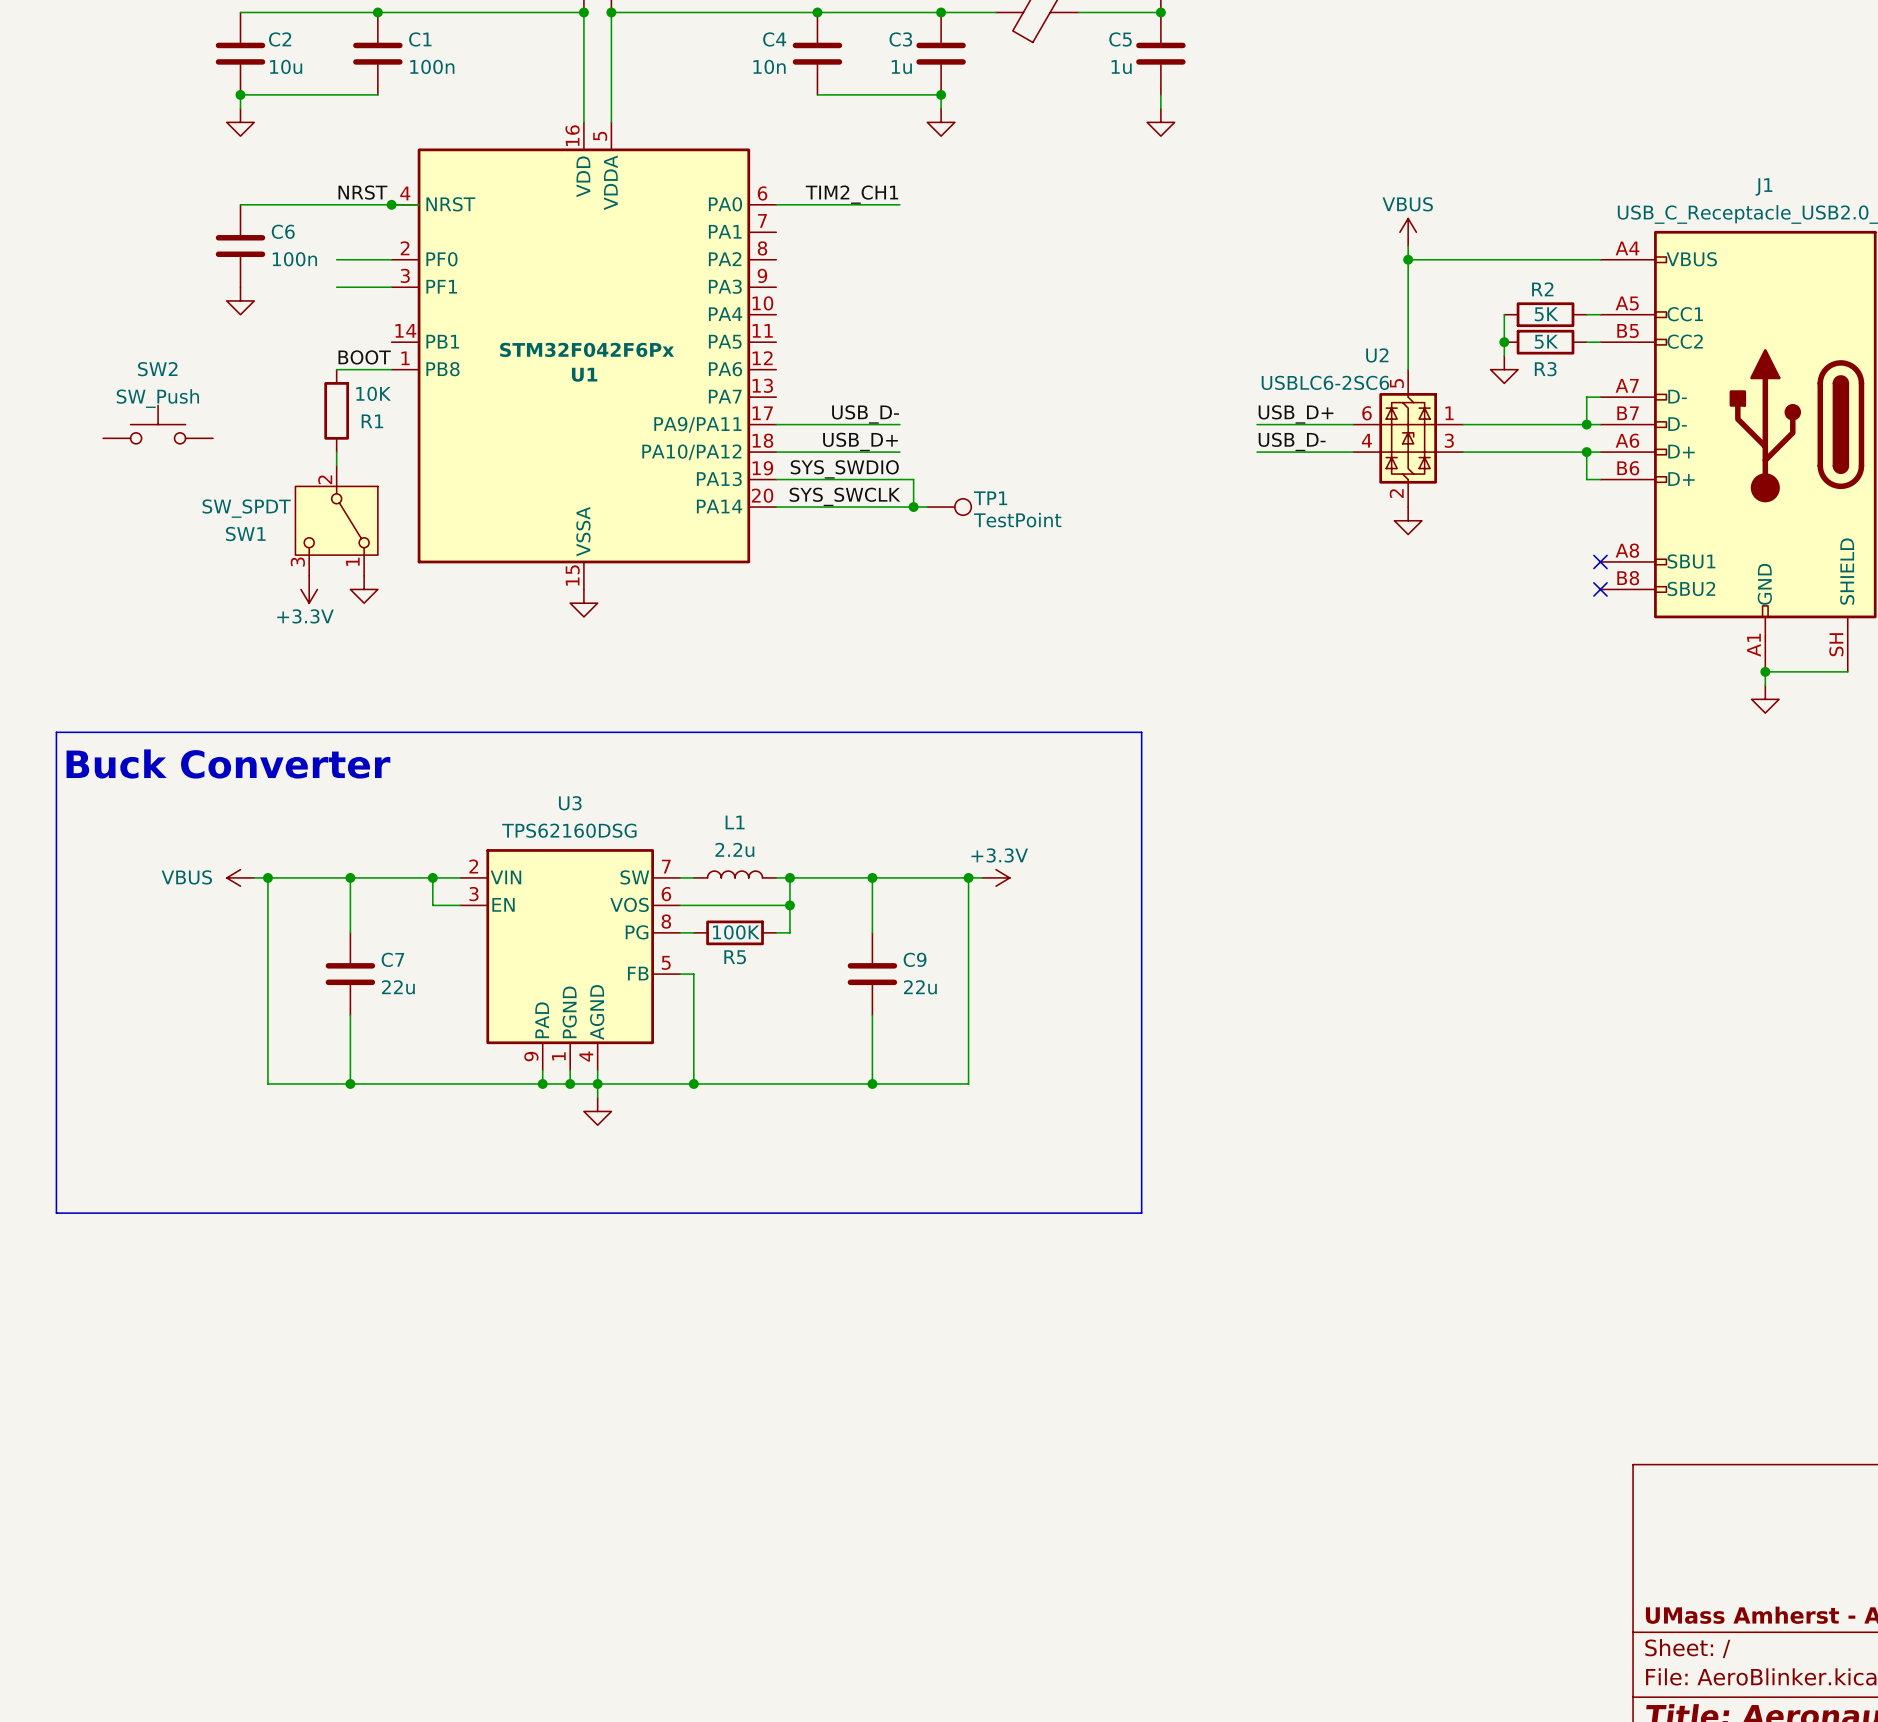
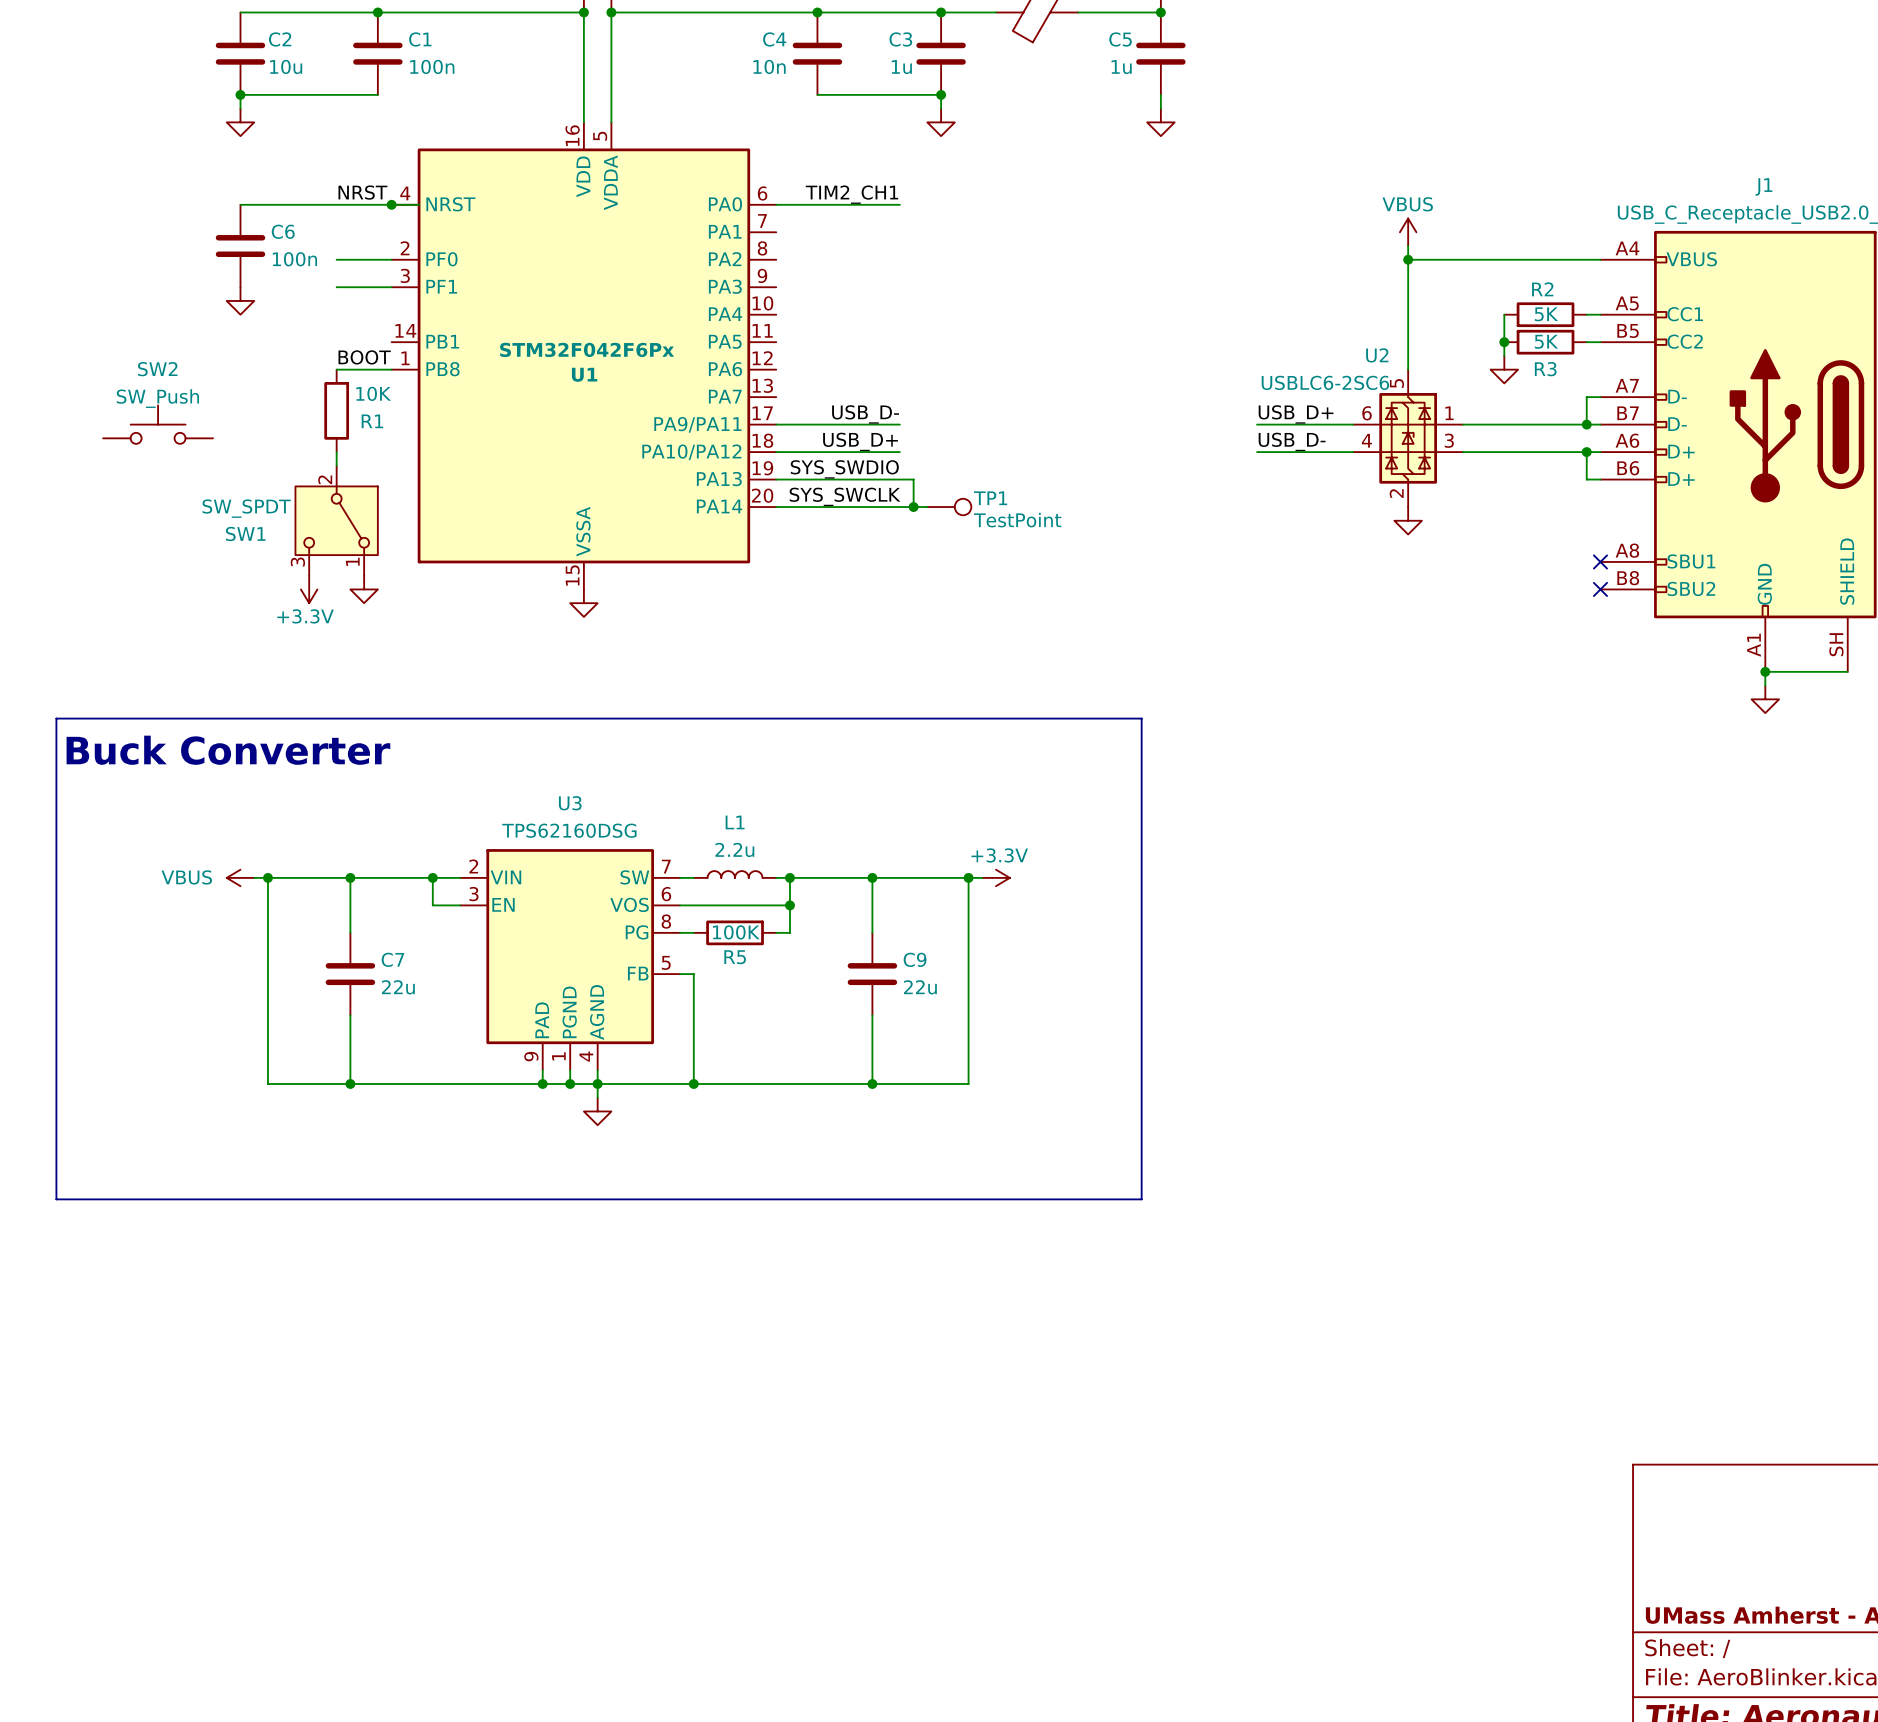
line: (56, 732) (1141, 732) -> (56, 732) (56, 718) (1141, 718) (1141, 732)
text position: Buck Converter (228, 763) -> Buck Converter (228, 750)
line: (56, 1199) (56, 1213) (1141, 1213) (1141, 1199) -> (56, 1199) (1141, 1199)

